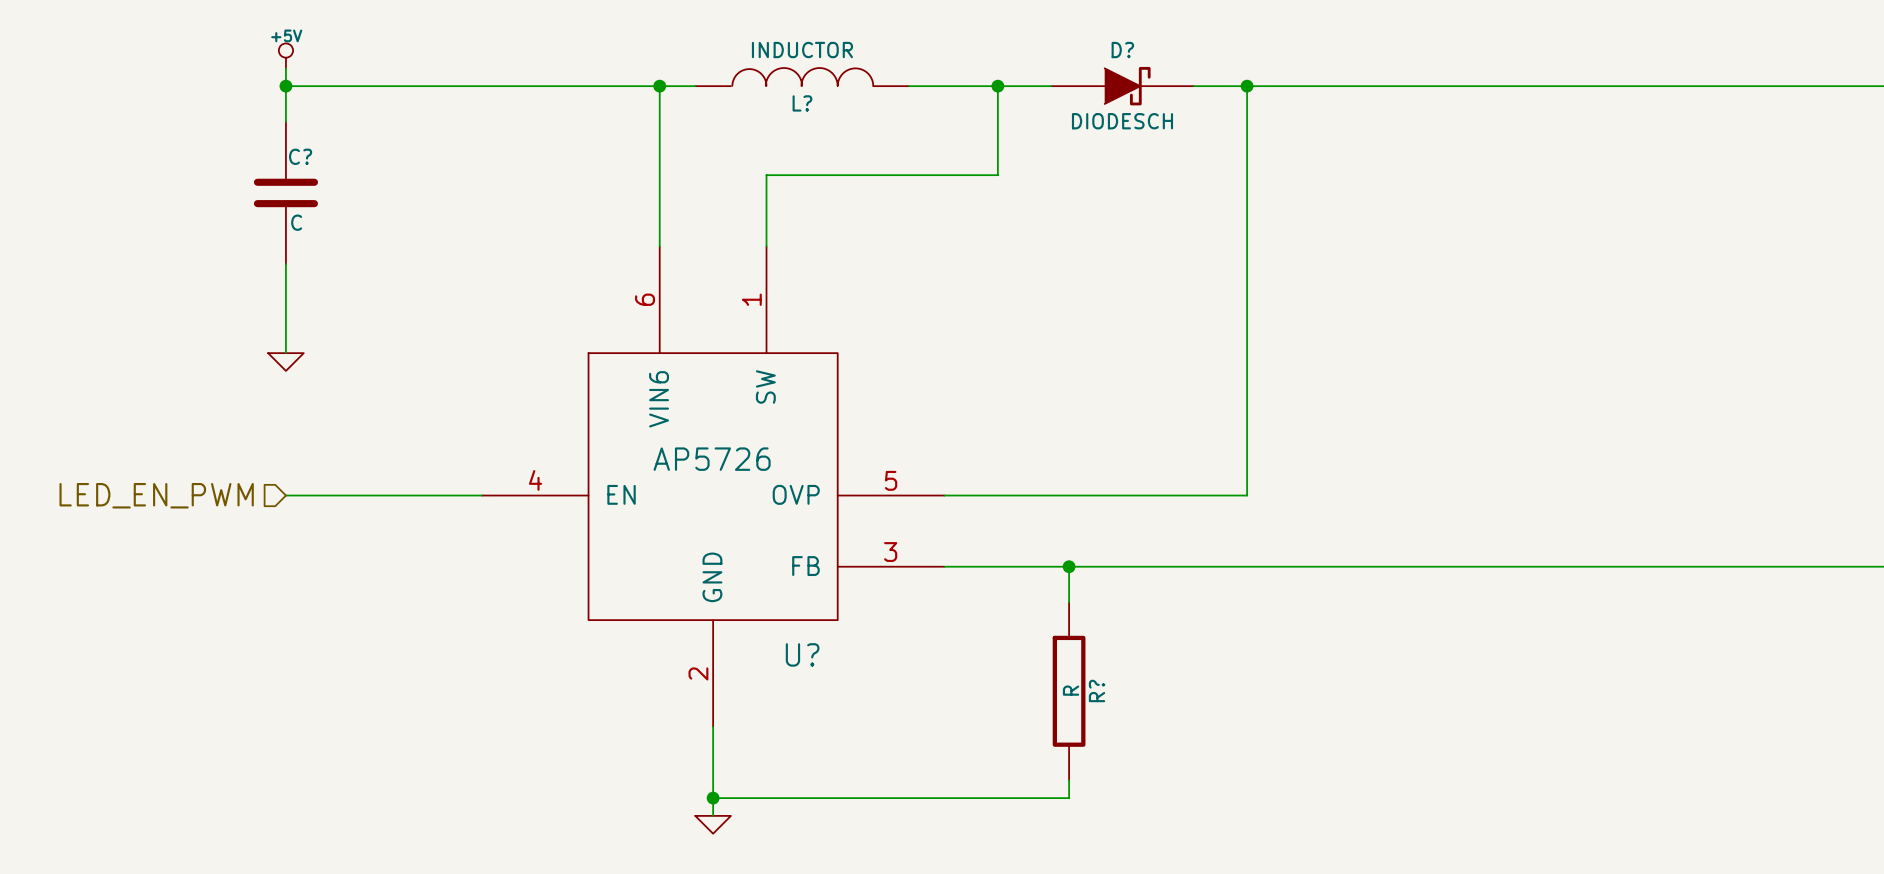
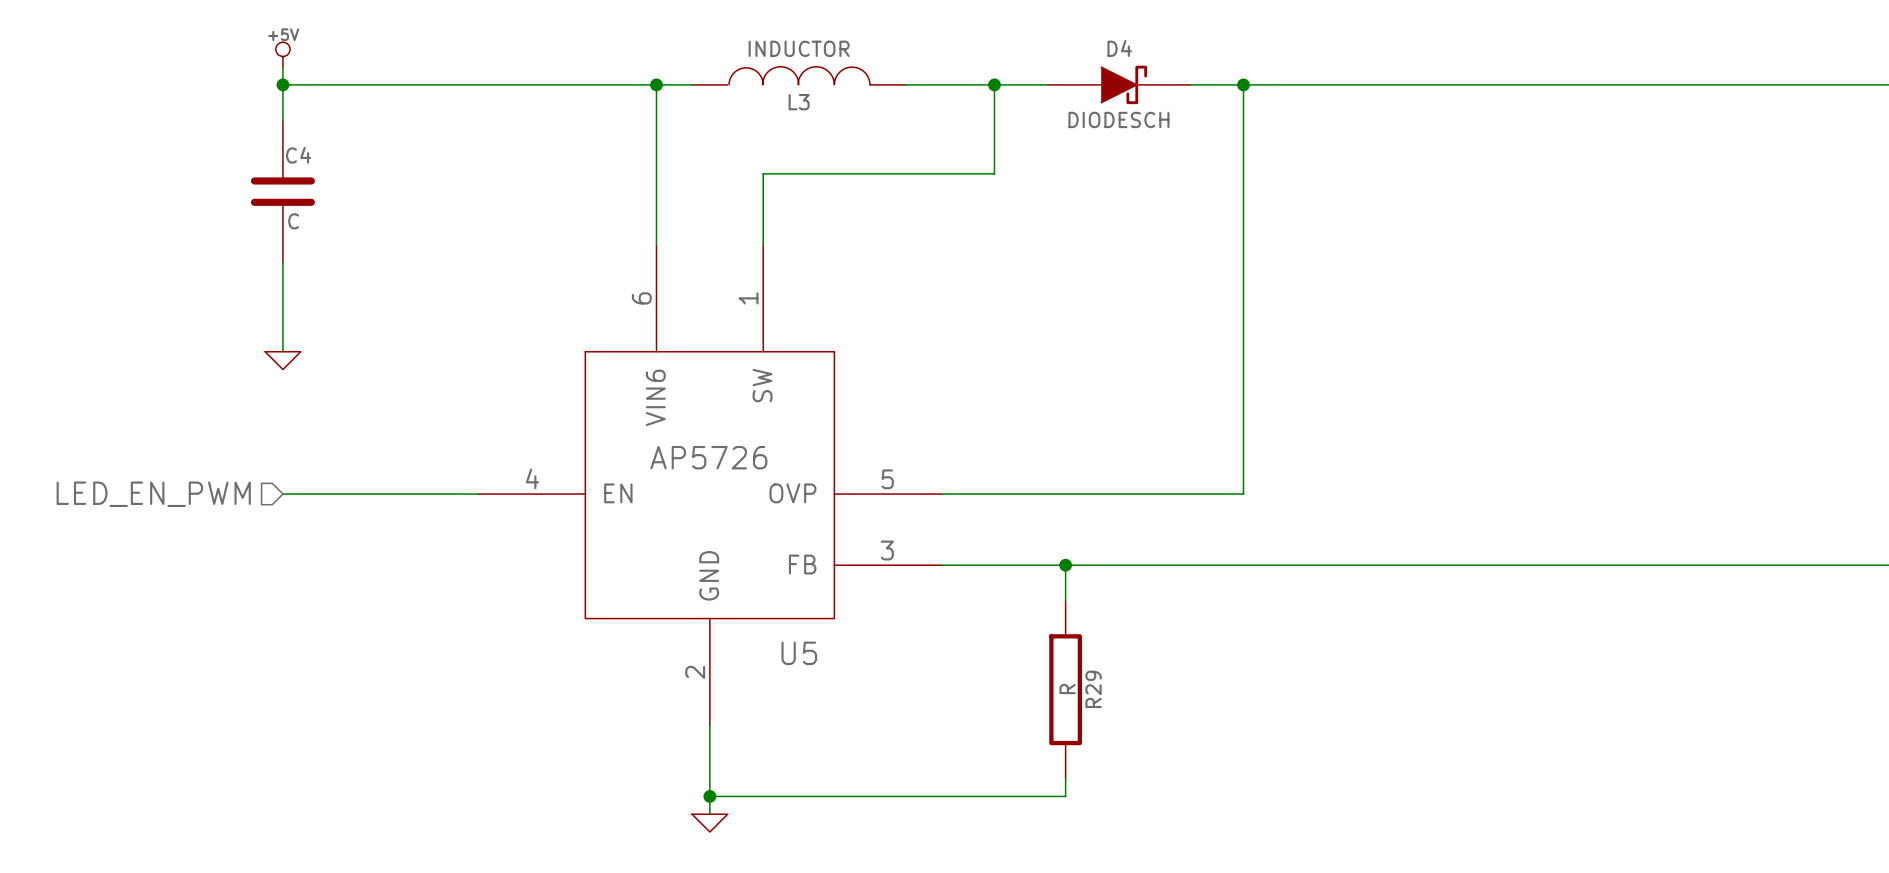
D? name: D? (1122, 50) -> D4 (1119, 48)
L? name: L? (802, 103) -> L3 (799, 102)
C? name: C? (300, 156) -> C4 (298, 155)
U? name: U? (802, 654) -> U5 (799, 653)
R? name: R? (1097, 690) -> R29 (1093, 689)

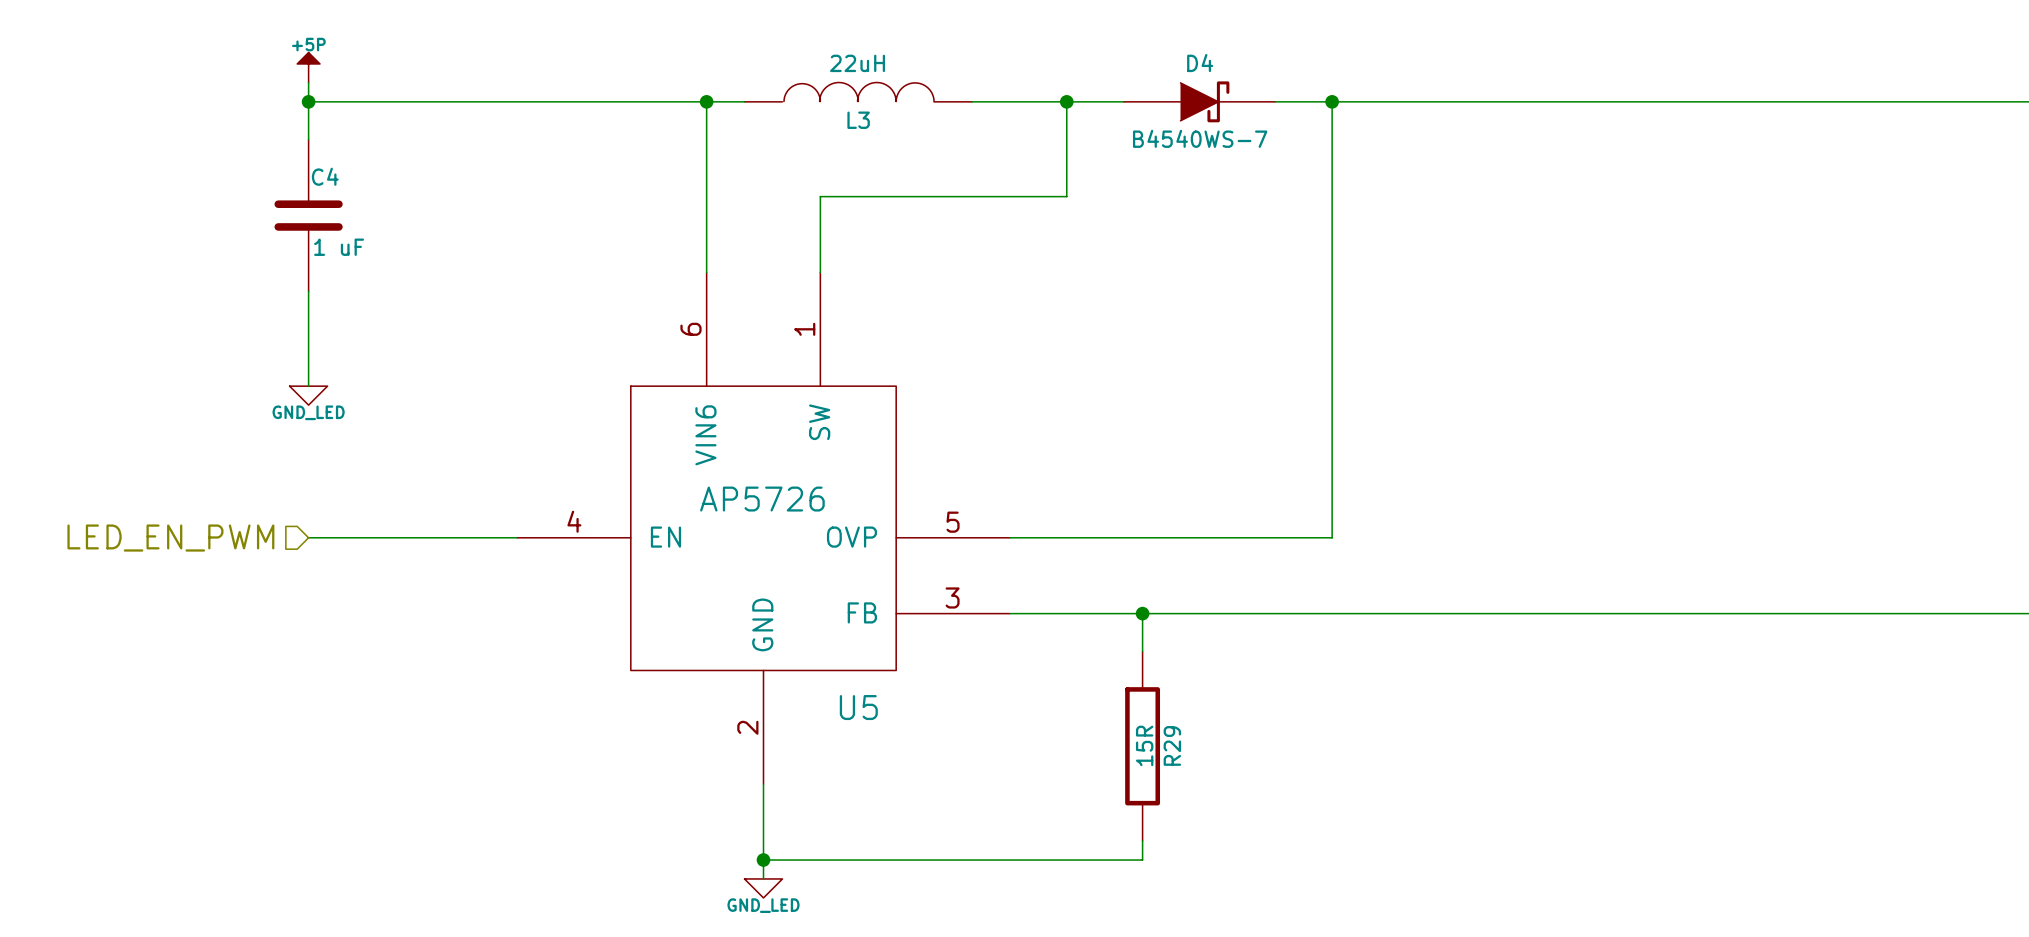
L3 value: INDUCTOR (799, 48) -> 22uH (857, 63)
power symbol: +5V (282, 54) -> +5P (308, 67)
D4 value: DIODESCH (1118, 119) -> B4540WS-7 (1200, 138)
C4 value: C (293, 221) -> 1 uF (339, 247)
power symbol text: none -> GND_LED (308, 412)
R29 value: R (1067, 689) -> 15R (1144, 745)
power symbol text: none -> GND_LED (763, 905)

